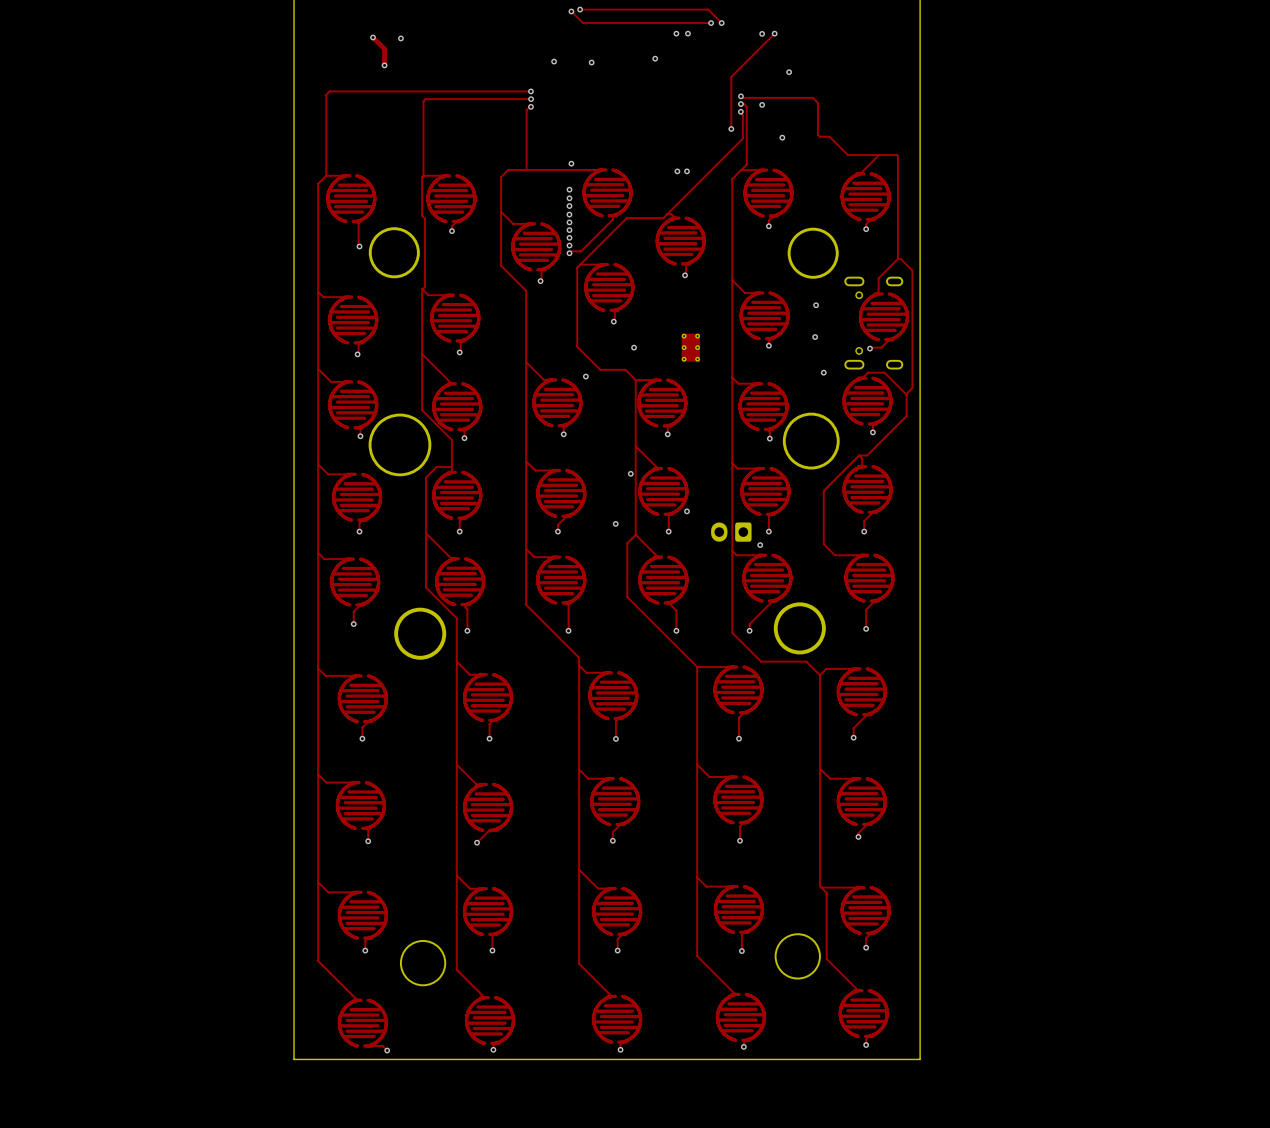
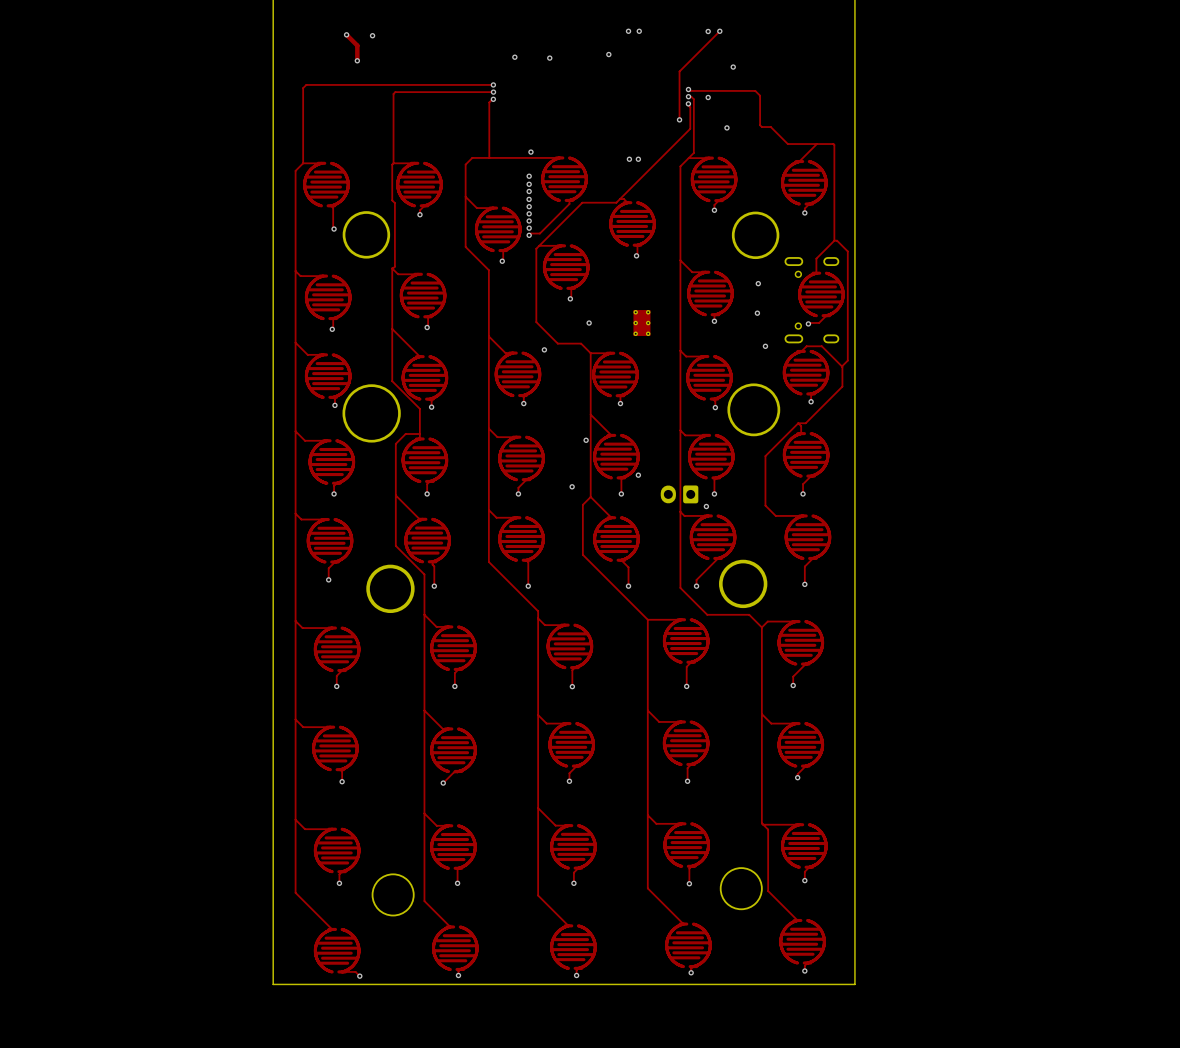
track: (580, 9) (708, 9) (721, 23) -> none
via: (580, 9) -> none
track: (571, 11) (582, 23) (711, 23) -> none
via: (571, 11) -> none
via: (711, 23) -> none
via: (721, 23) -> none

